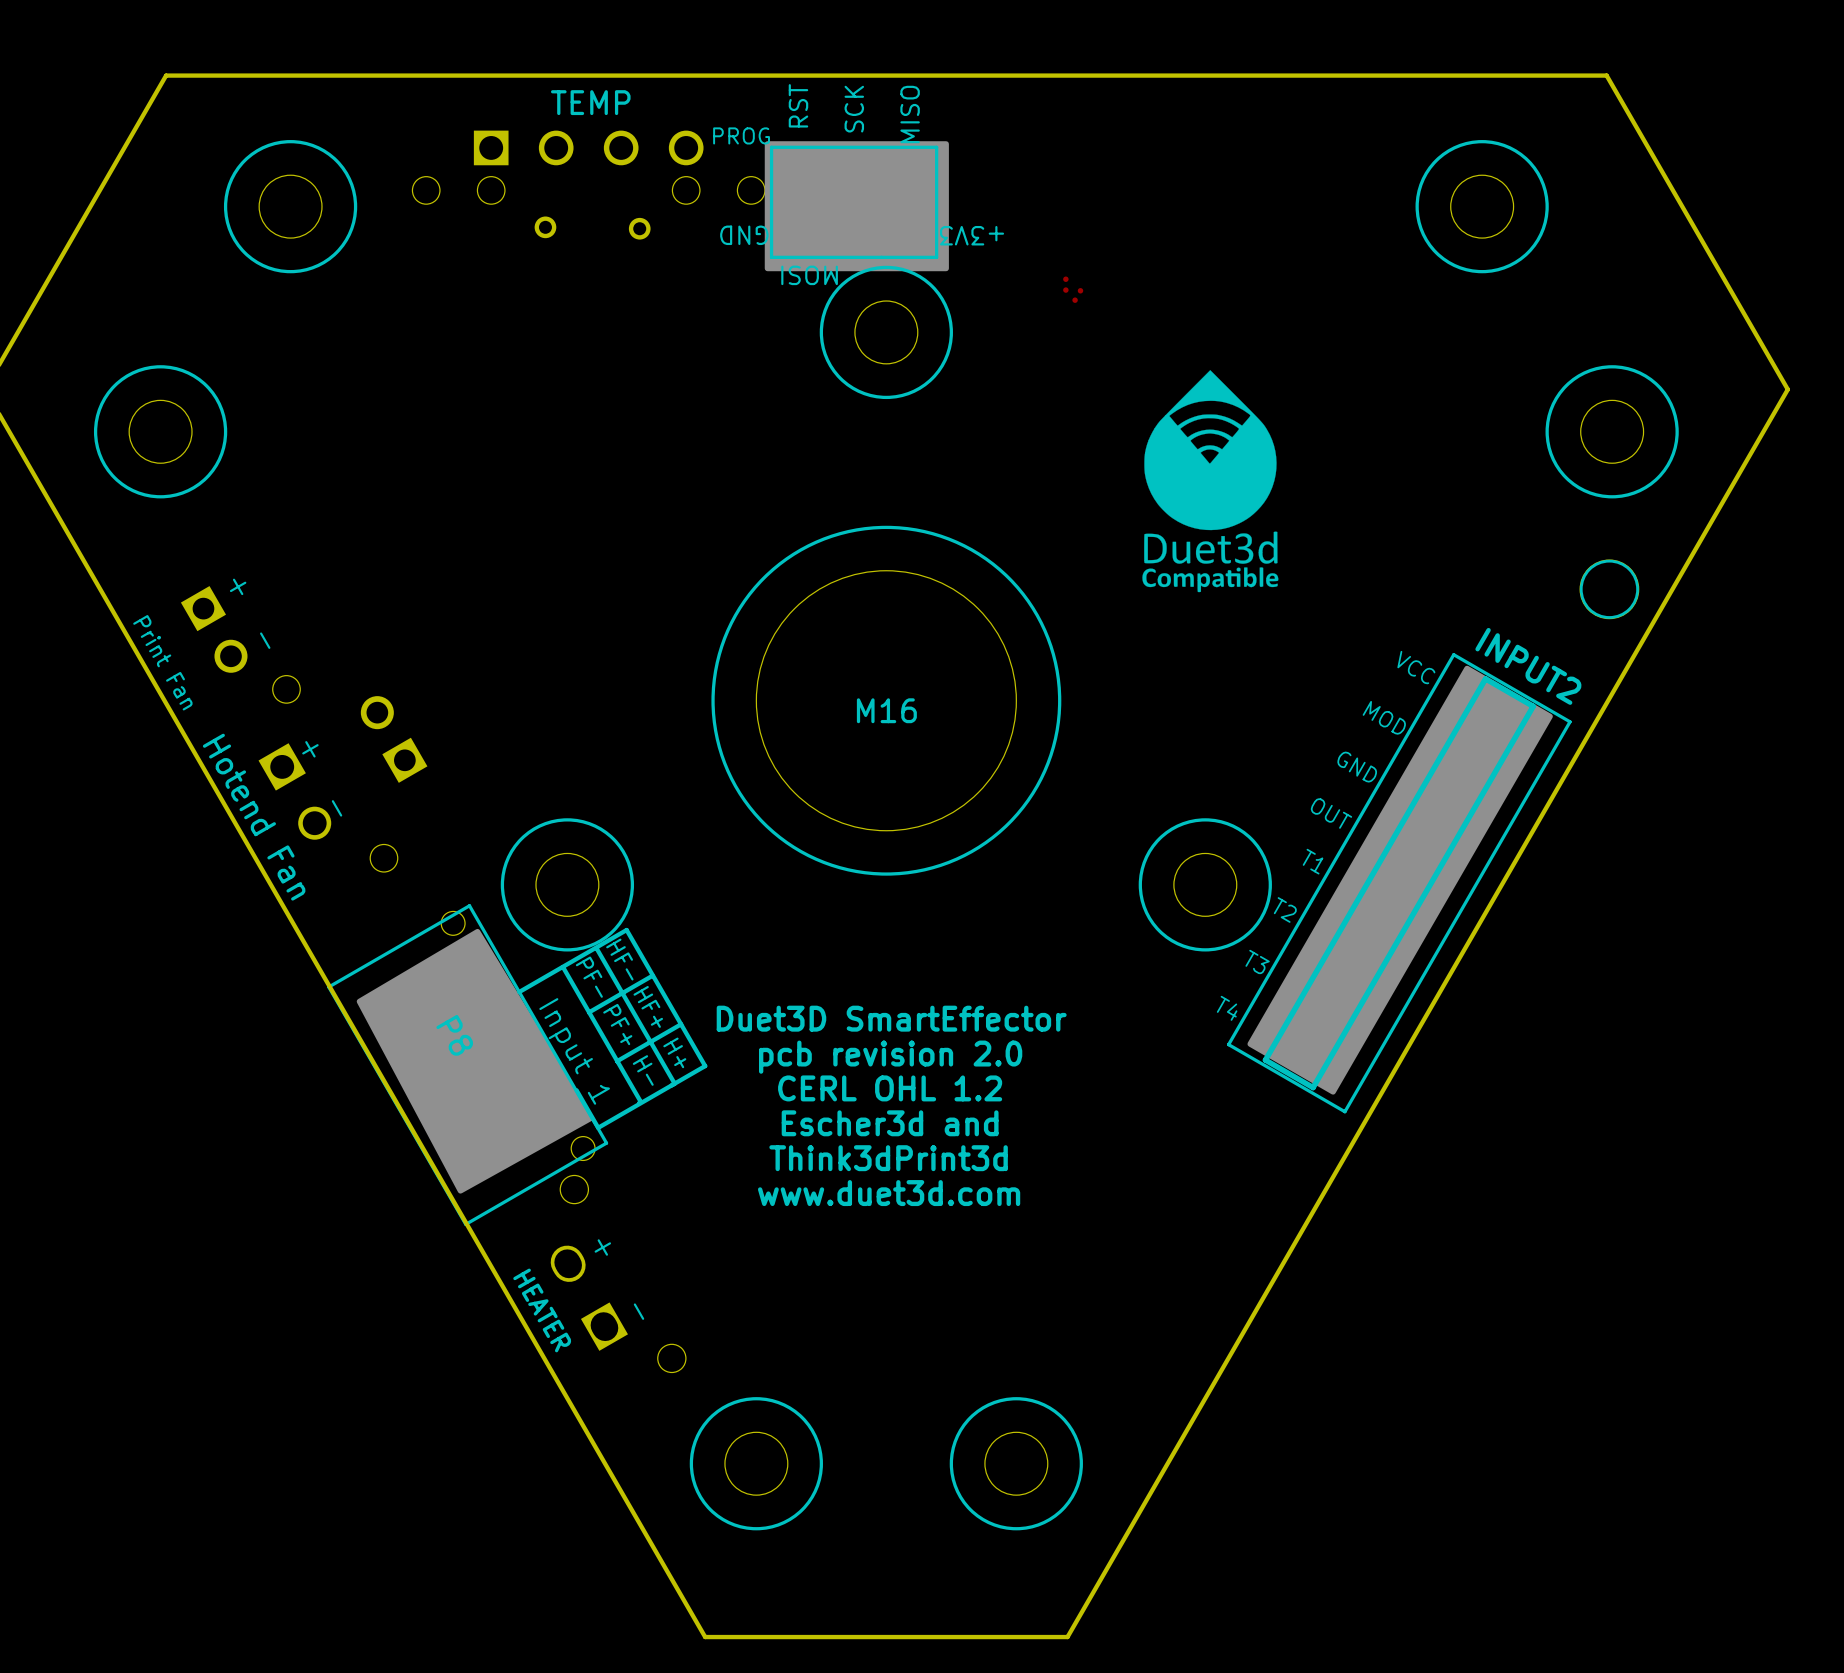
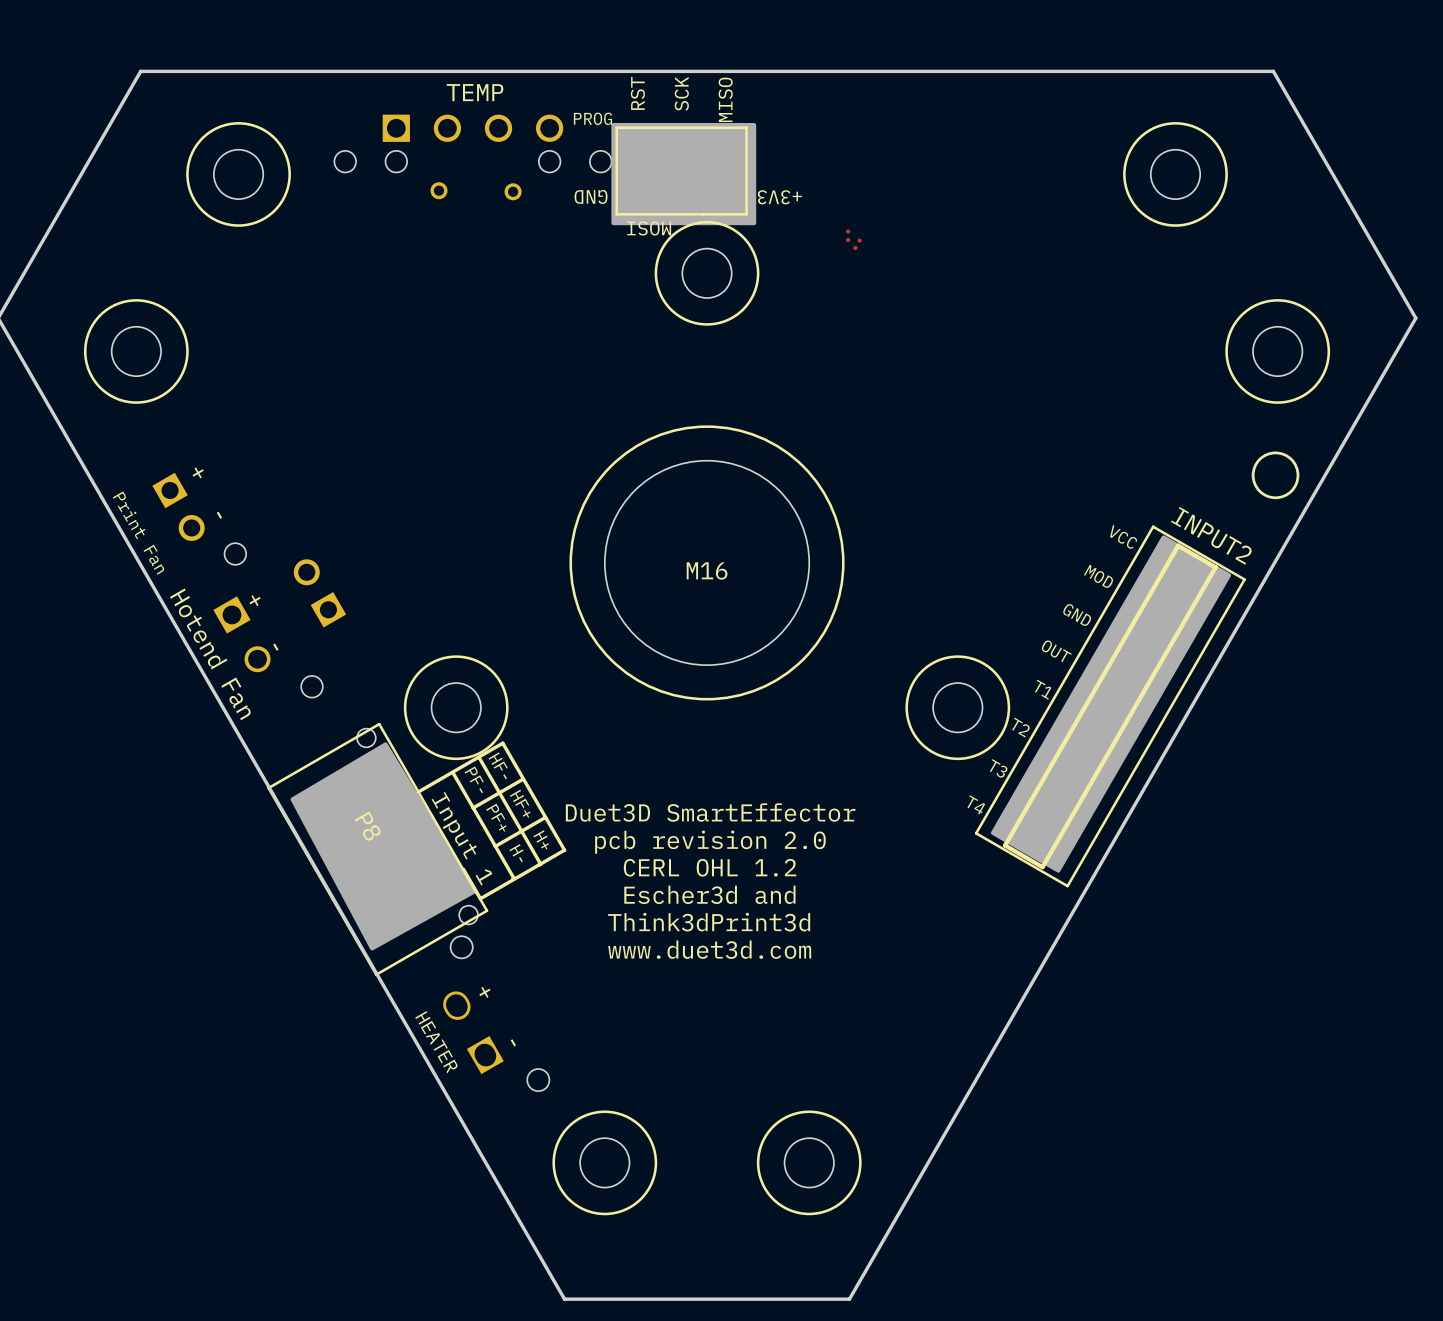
drawing: [1142, 370, 1279, 593] -> none

